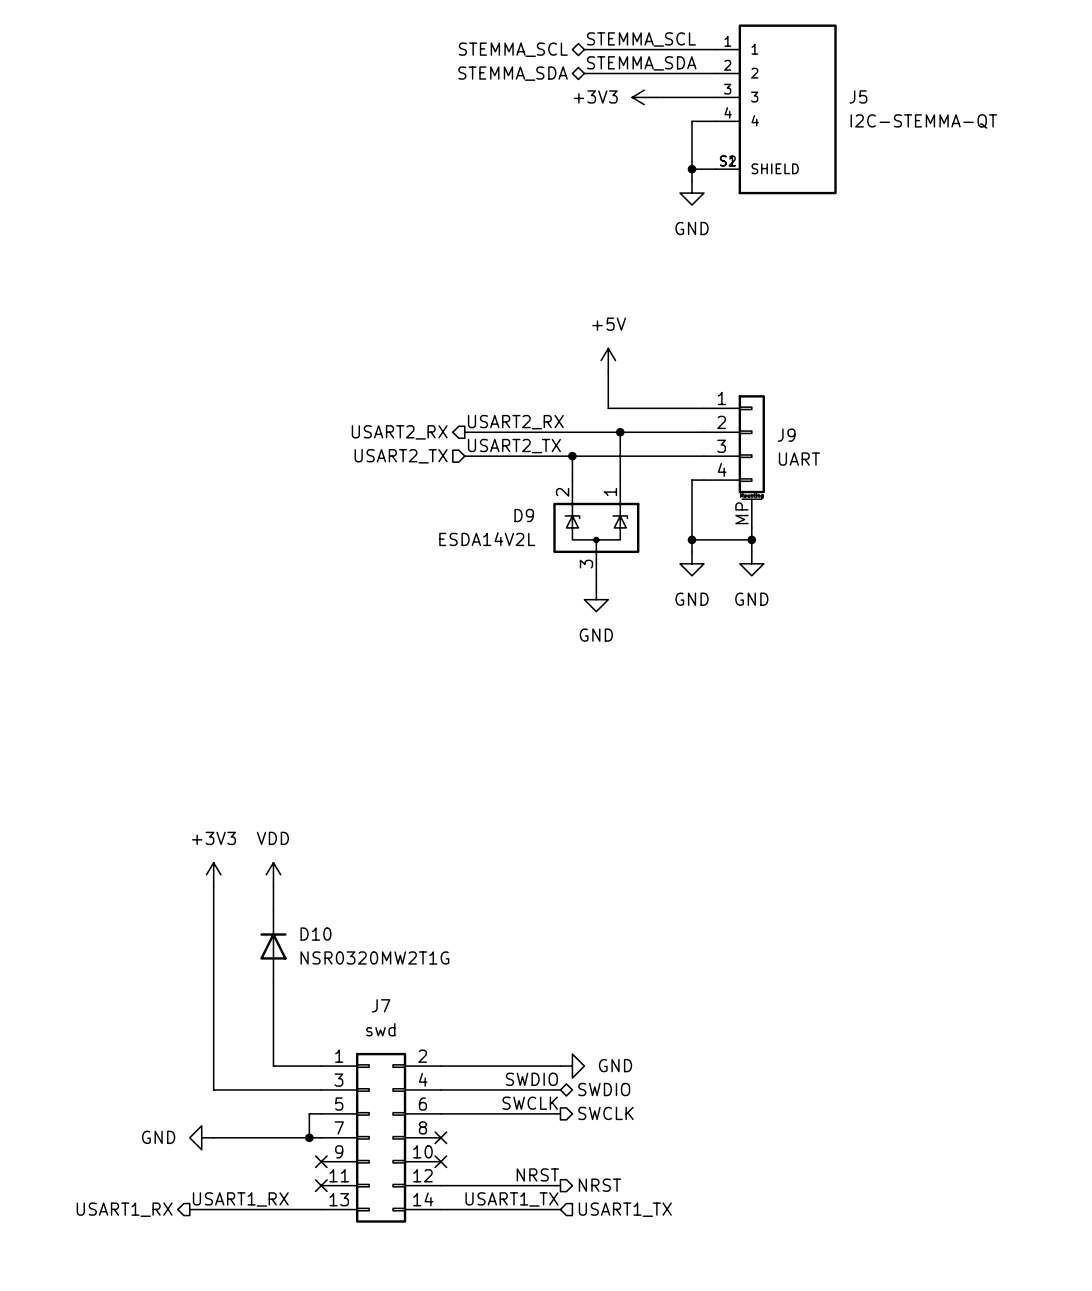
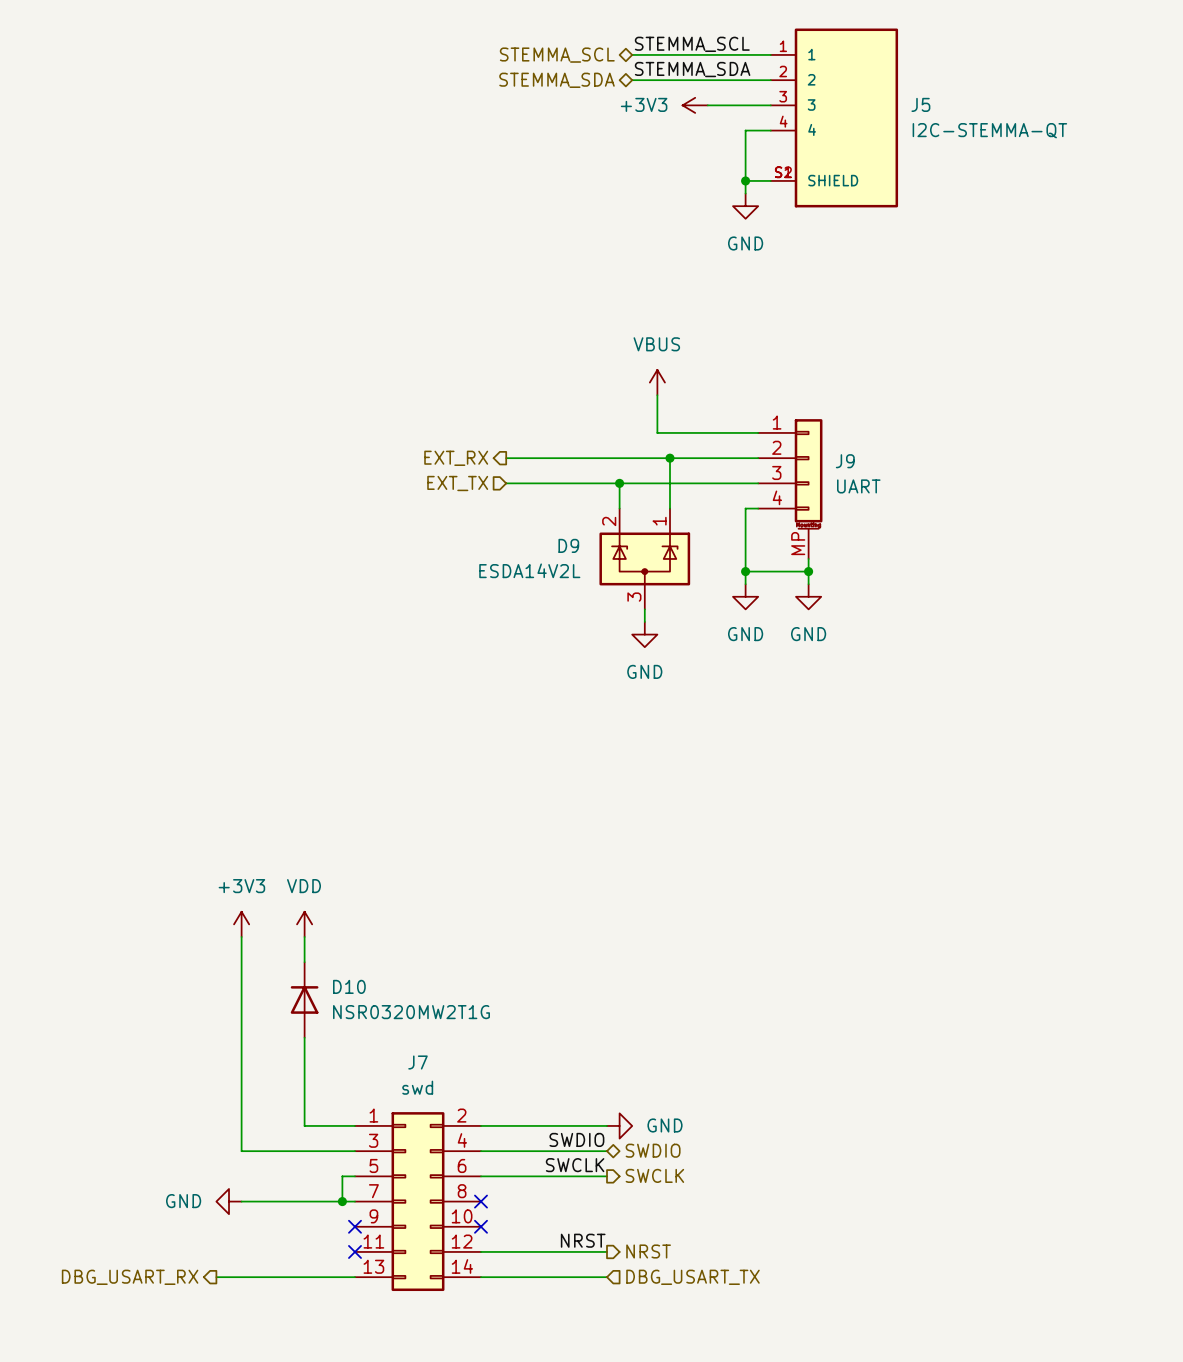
power symbol: +5V (608, 360) -> VBUS (657, 382)
label: USART2_RX (515, 422) -> none
hierarchical label: USART2_RX (399, 432) -> EXT_RX (456, 458)
label: USART2_TX (514, 446) -> none
hierarchical label: USART2_TX (401, 456) -> EXT_TX (457, 483)
label: USART1_RX (240, 1199) -> none
label: USART1_TX (511, 1199) -> none
hierarchical label: USART1_RX (124, 1209) -> DBG_USART_RX (130, 1277)
hierarchical label: USART1_TX (625, 1209) -> DBG_USART_TX (692, 1277)

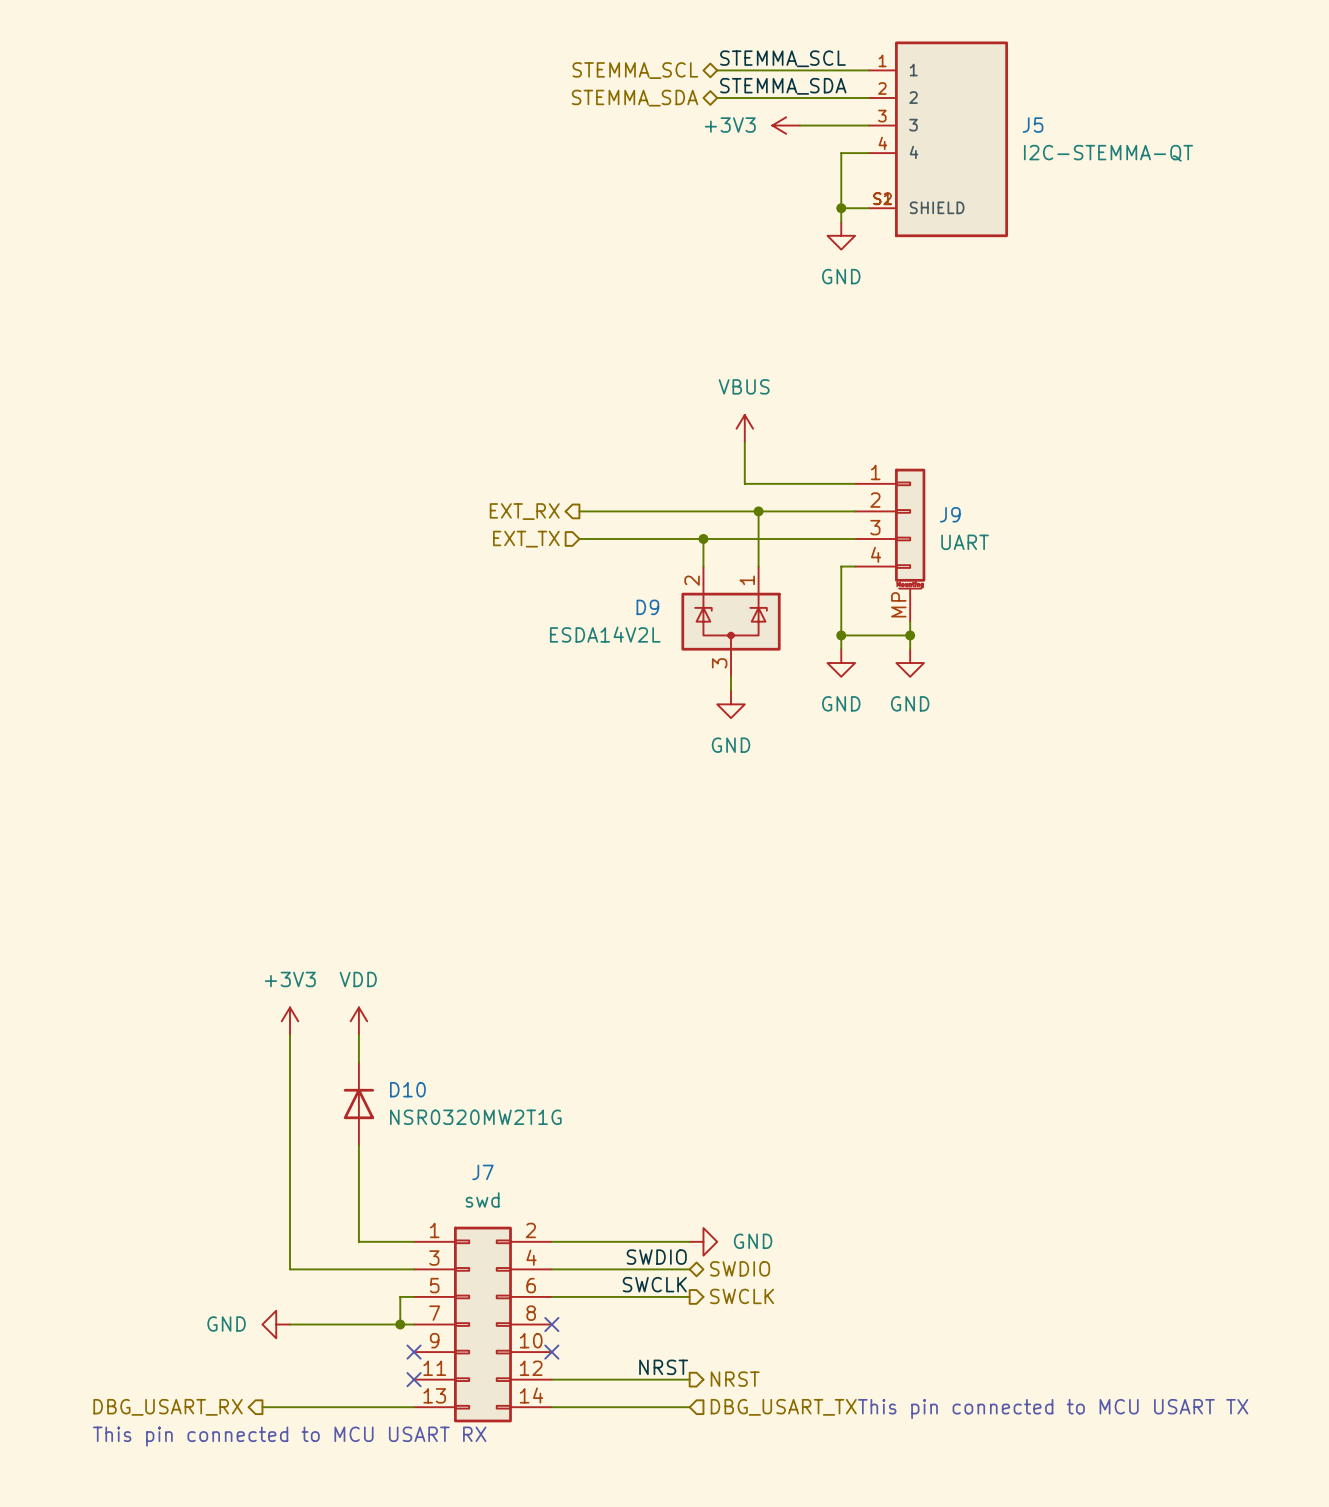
text: none -> This pin connected to MCU USART TX (1053, 1409)
text: none -> This pin connected to MCU USART RX (289, 1436)

